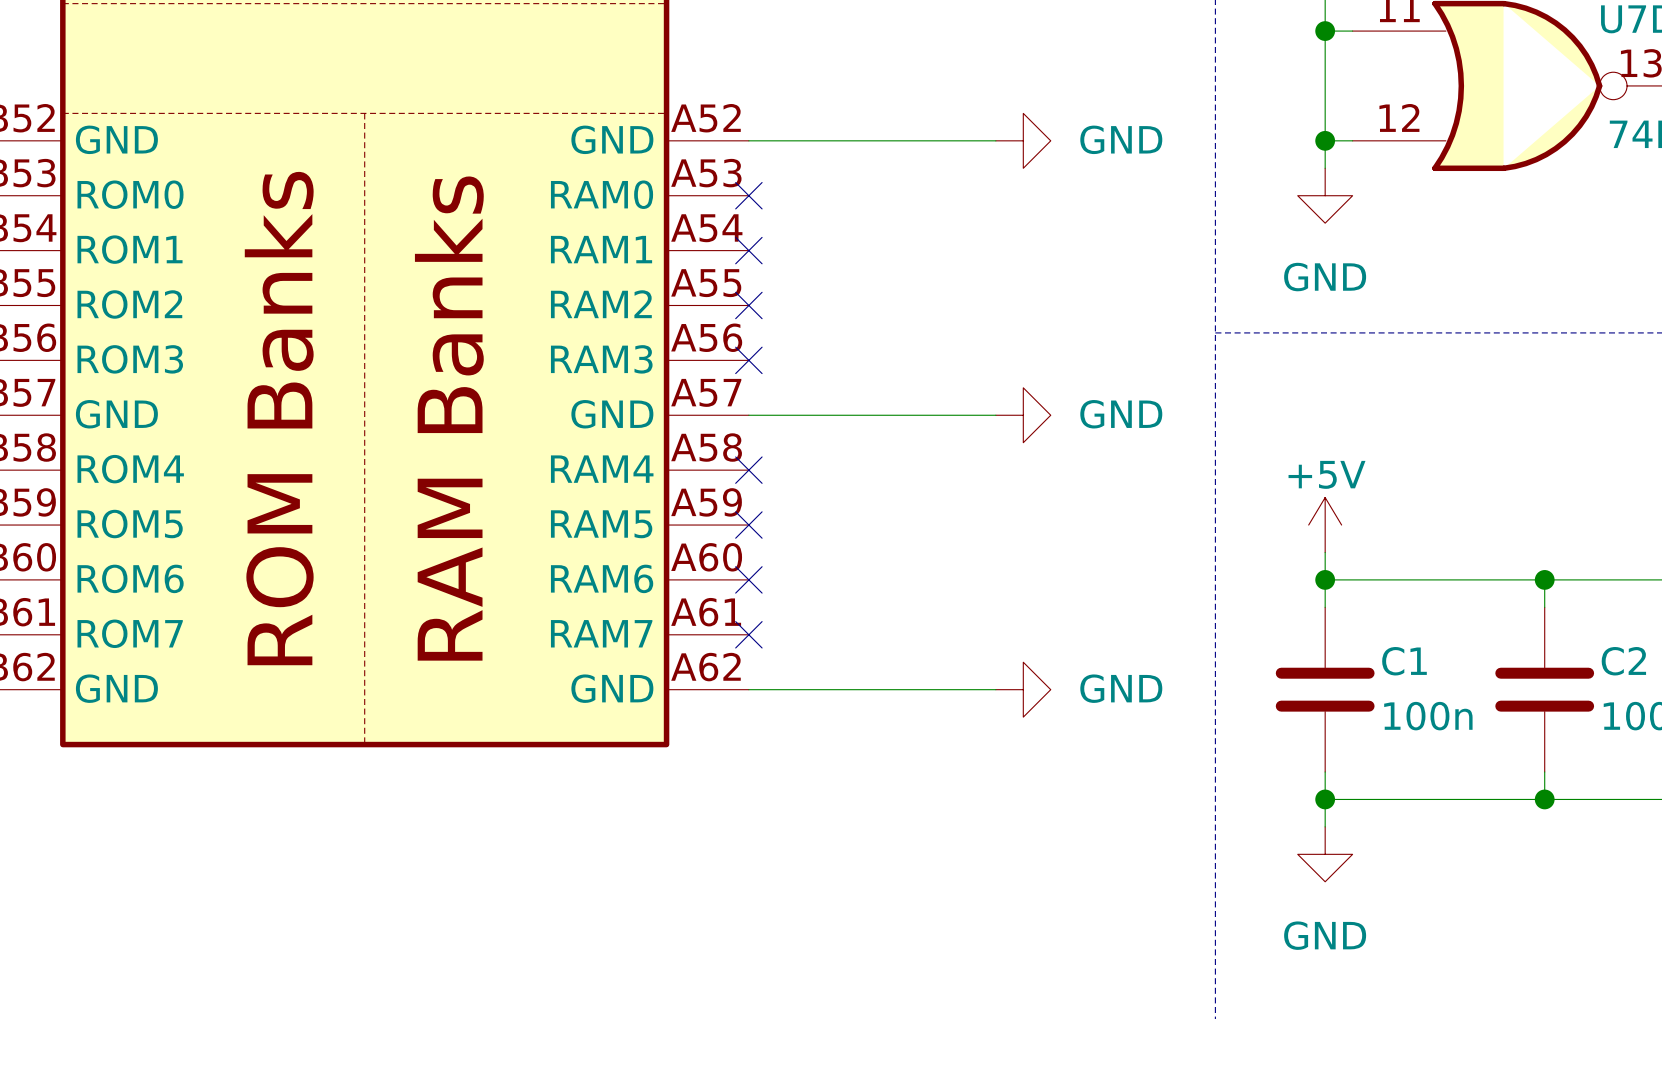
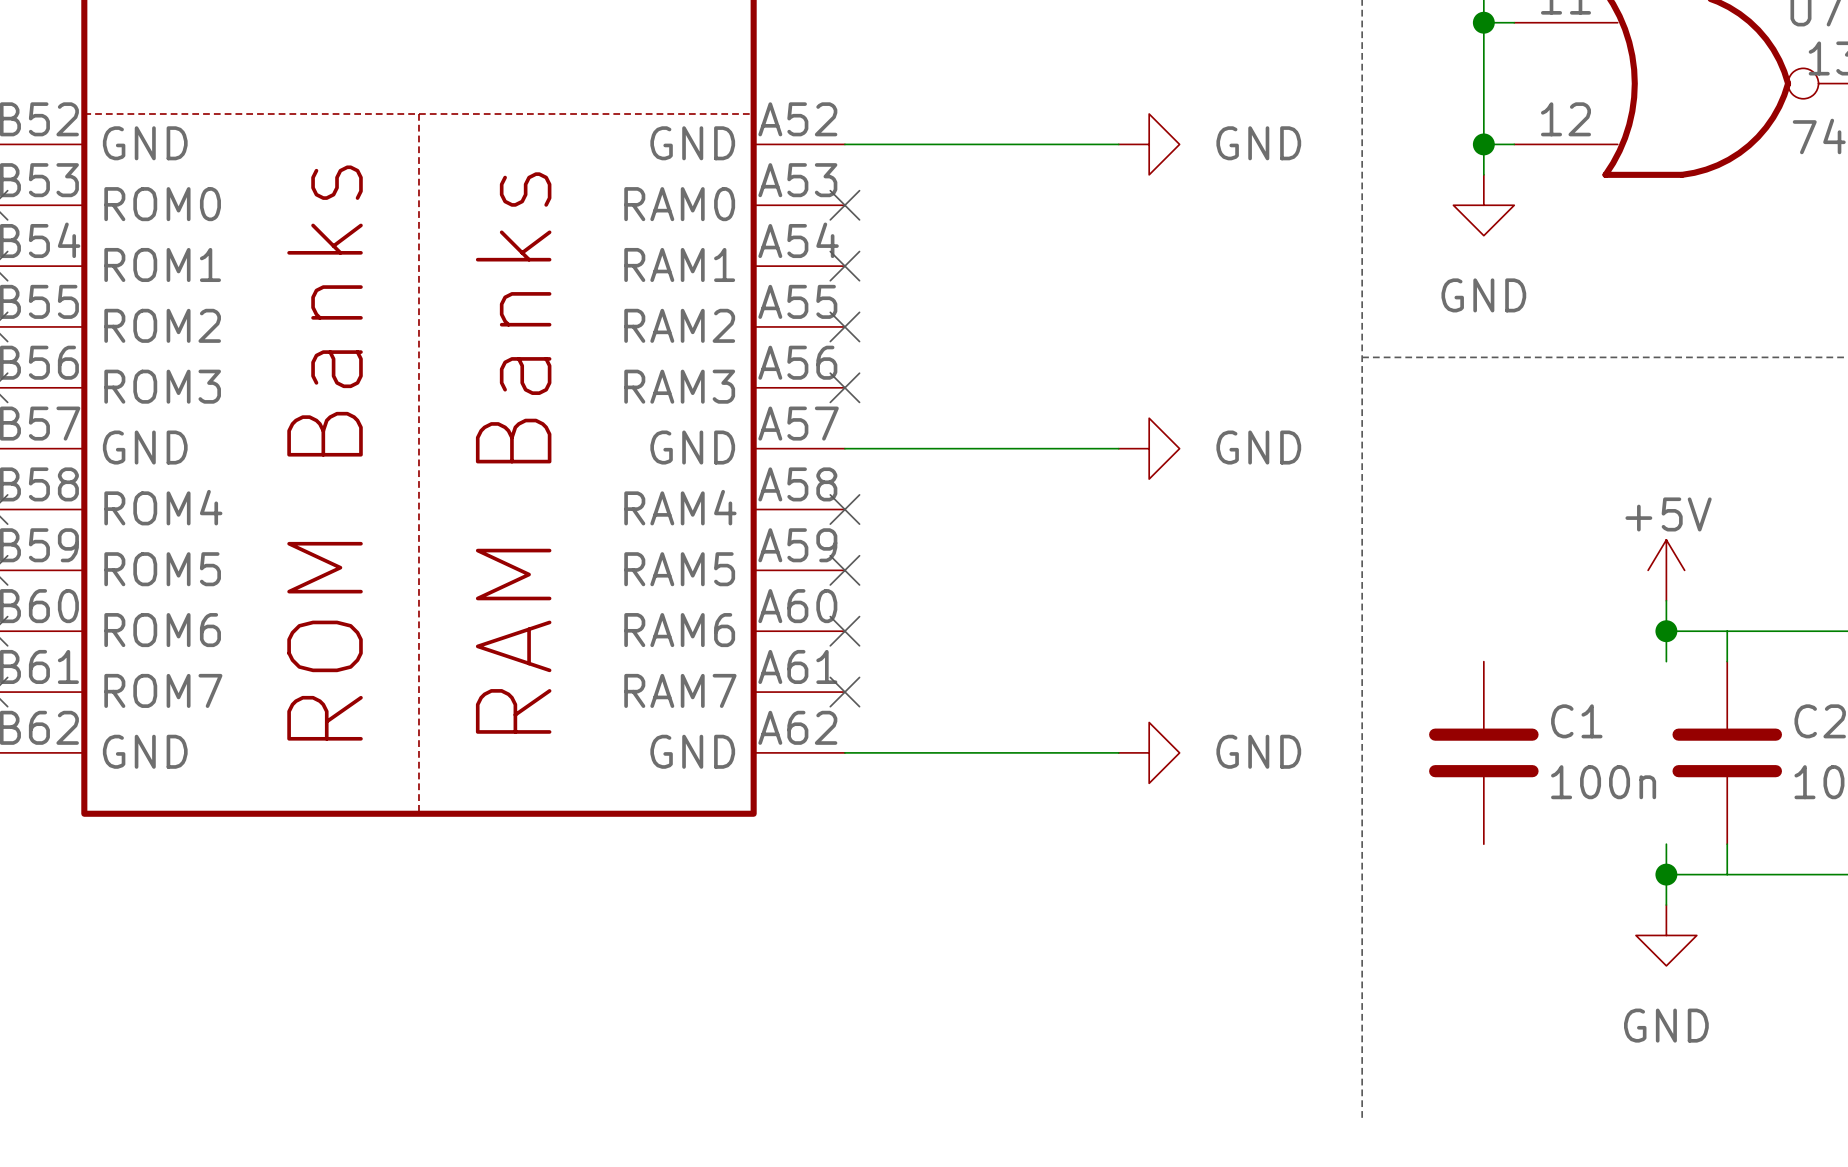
power symbol position: +5V (1325, 525) -> +5V (1666, 570)
wire: (1325, 552) (1325, 607) -> (1666, 600) (1666, 661)
wire: (1325, 579) (1489, 579) -> none
junction: (1325, 579) -> none
junction position: (1544, 579) -> (1666, 631)
wire: (1325, 772) (1325, 826) -> (1666, 844) (1666, 905)
wire: (1325, 799) (1489, 799) -> none
junction: (1325, 799) -> none
junction position: (1544, 799) -> (1666, 874)
power symbol position: GND (1325, 854) -> GND (1666, 935)

